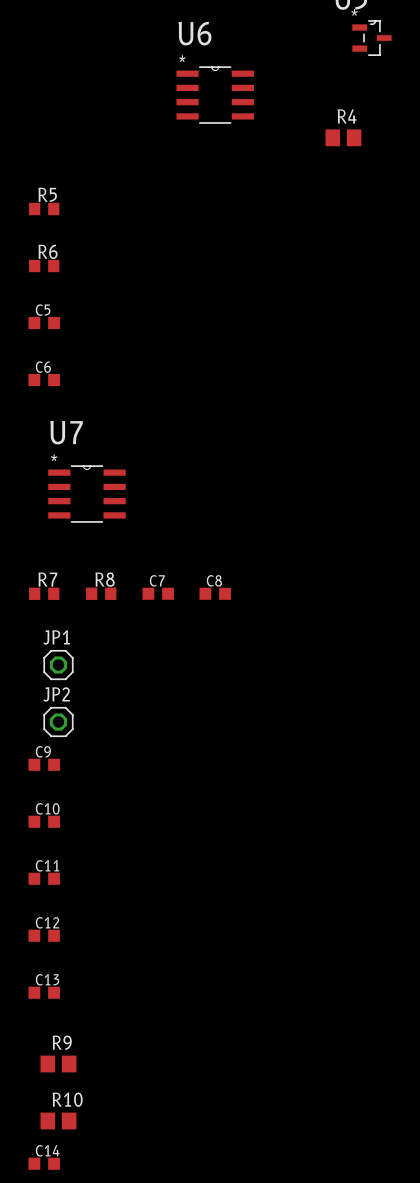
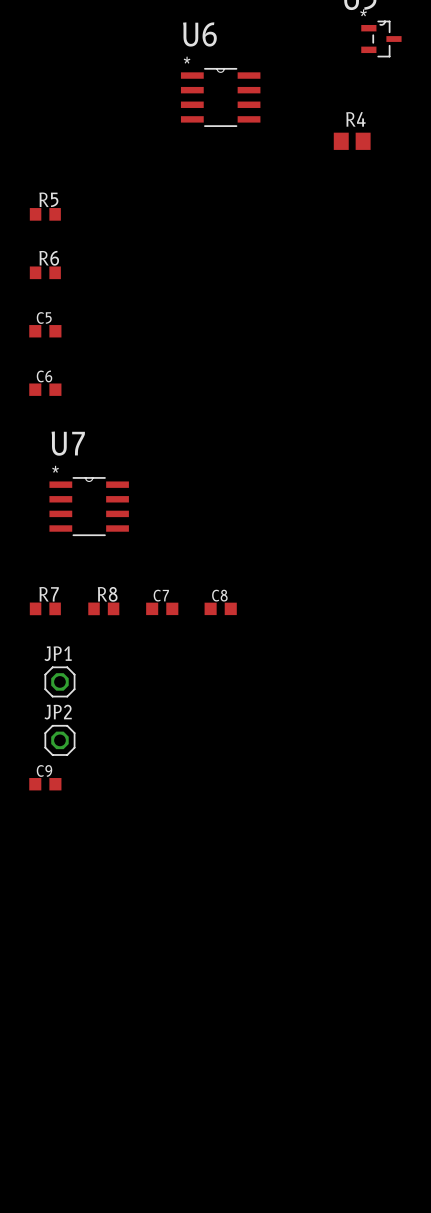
C10: (44, 821) -> none
C11: (44, 878) -> none
C12: (44, 935) -> none
C13: (44, 992) -> none
R9: (58, 1064) -> none
R10: (58, 1121) -> none
C14: (44, 1163) -> none

